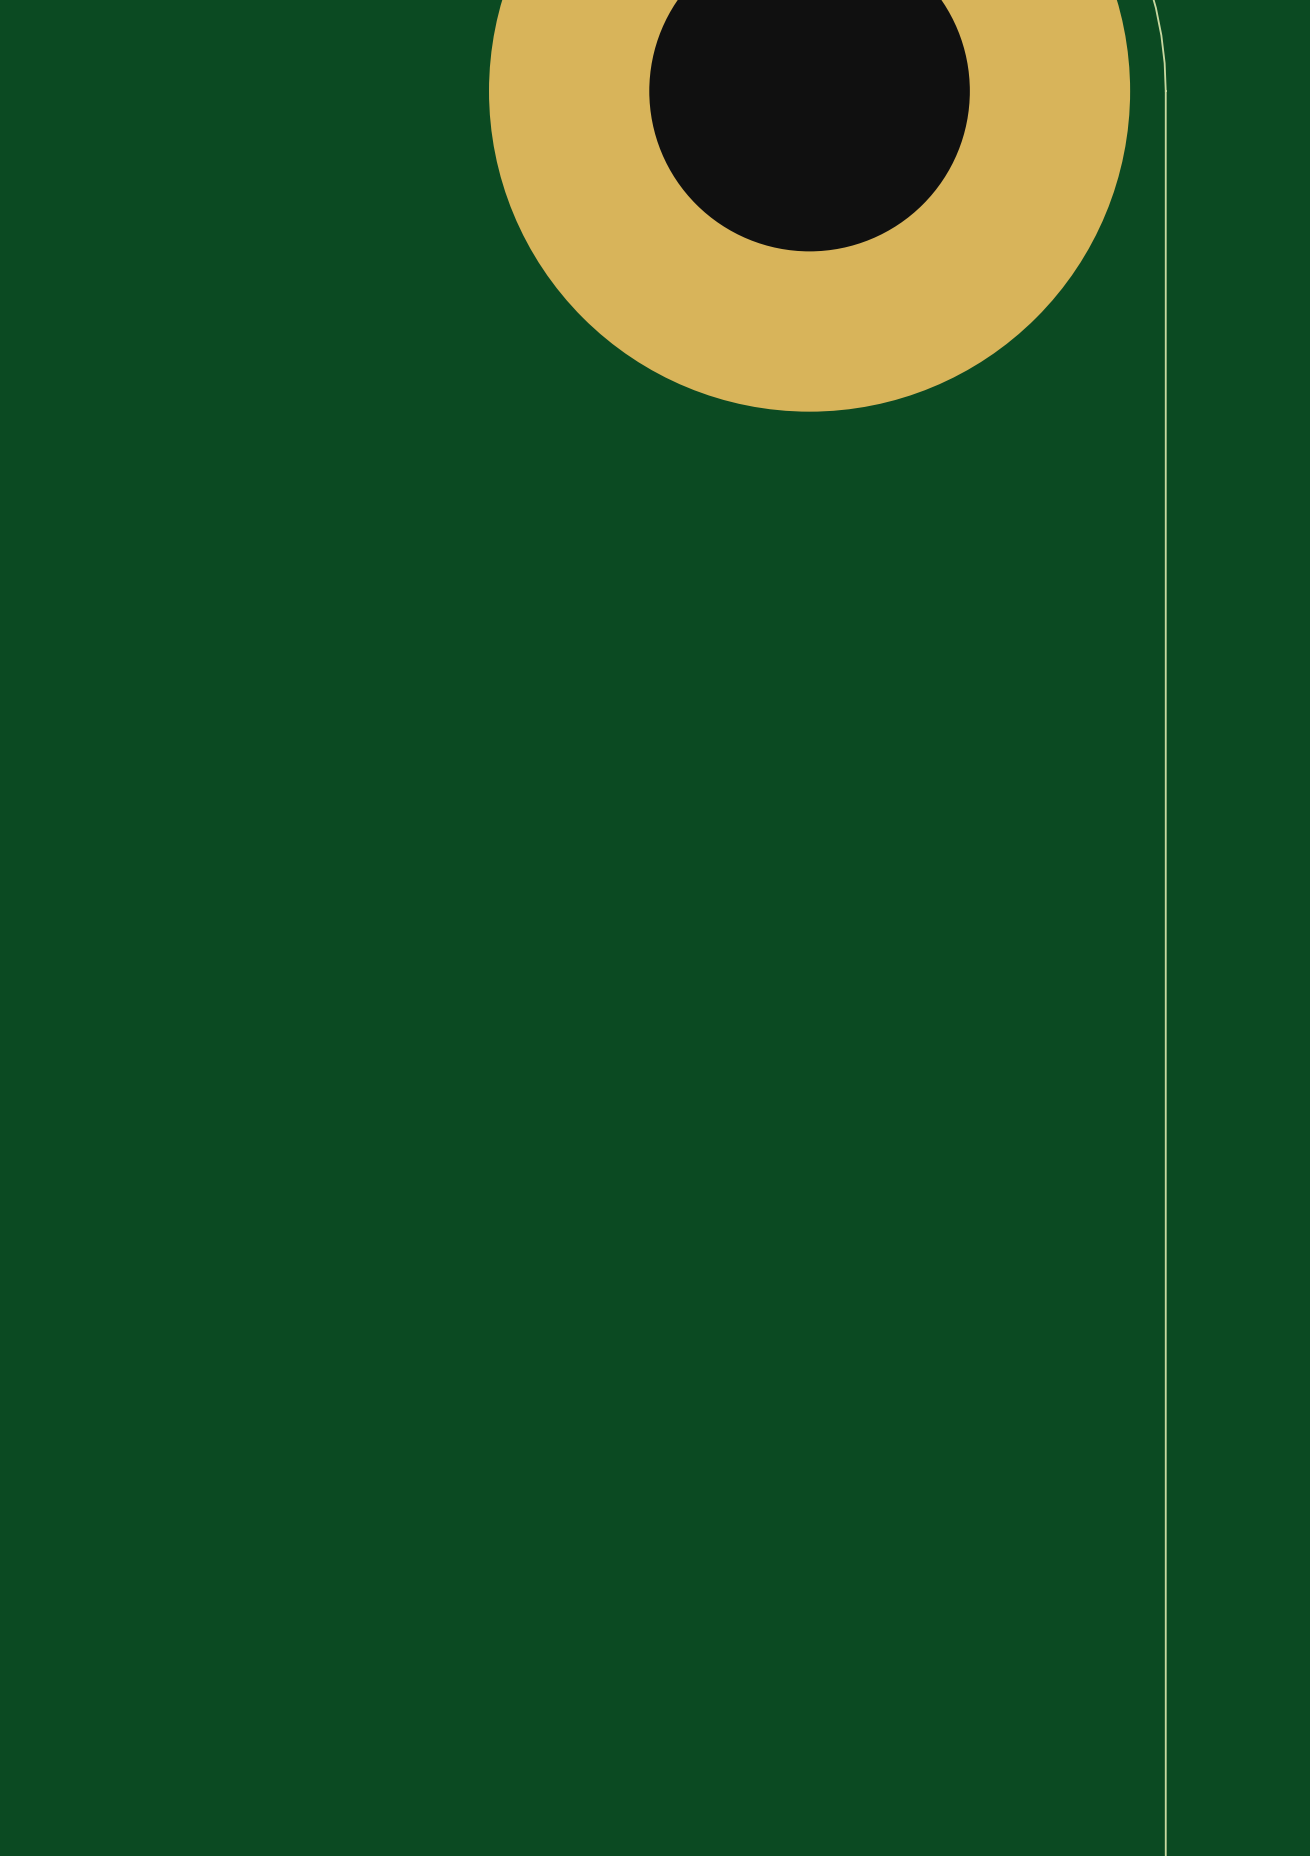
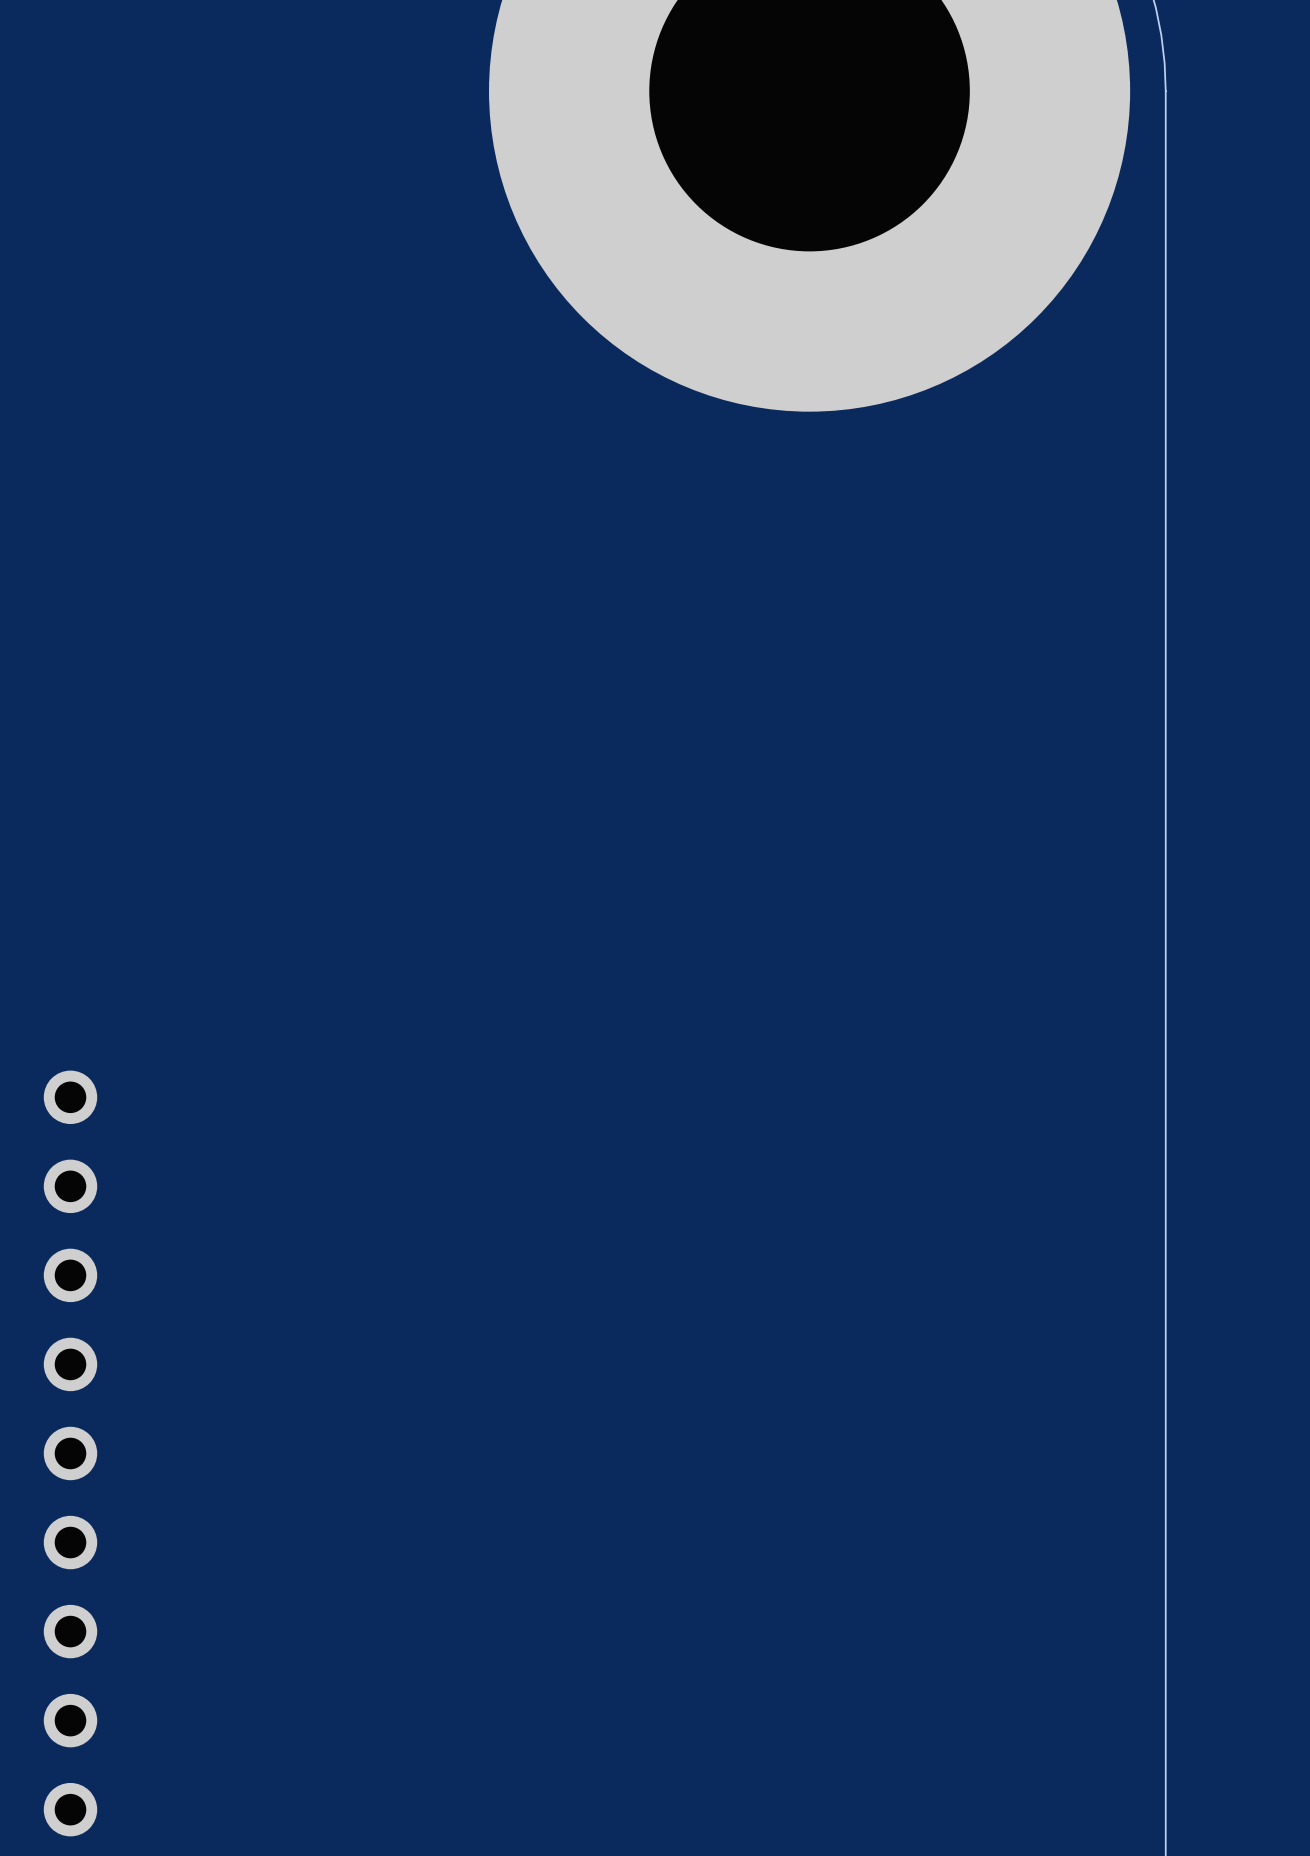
part: none -> (70, 1453)

